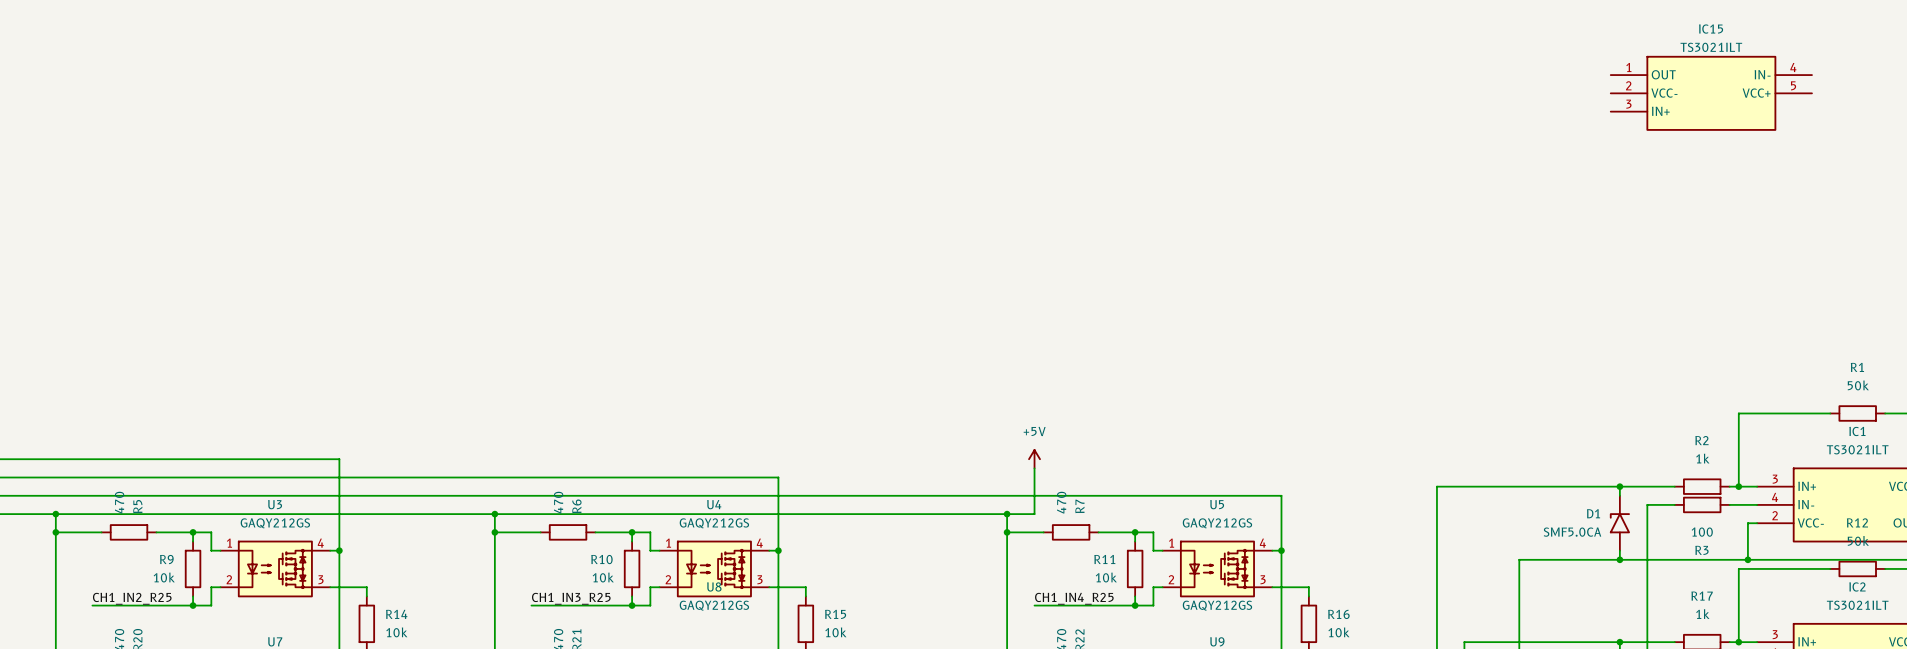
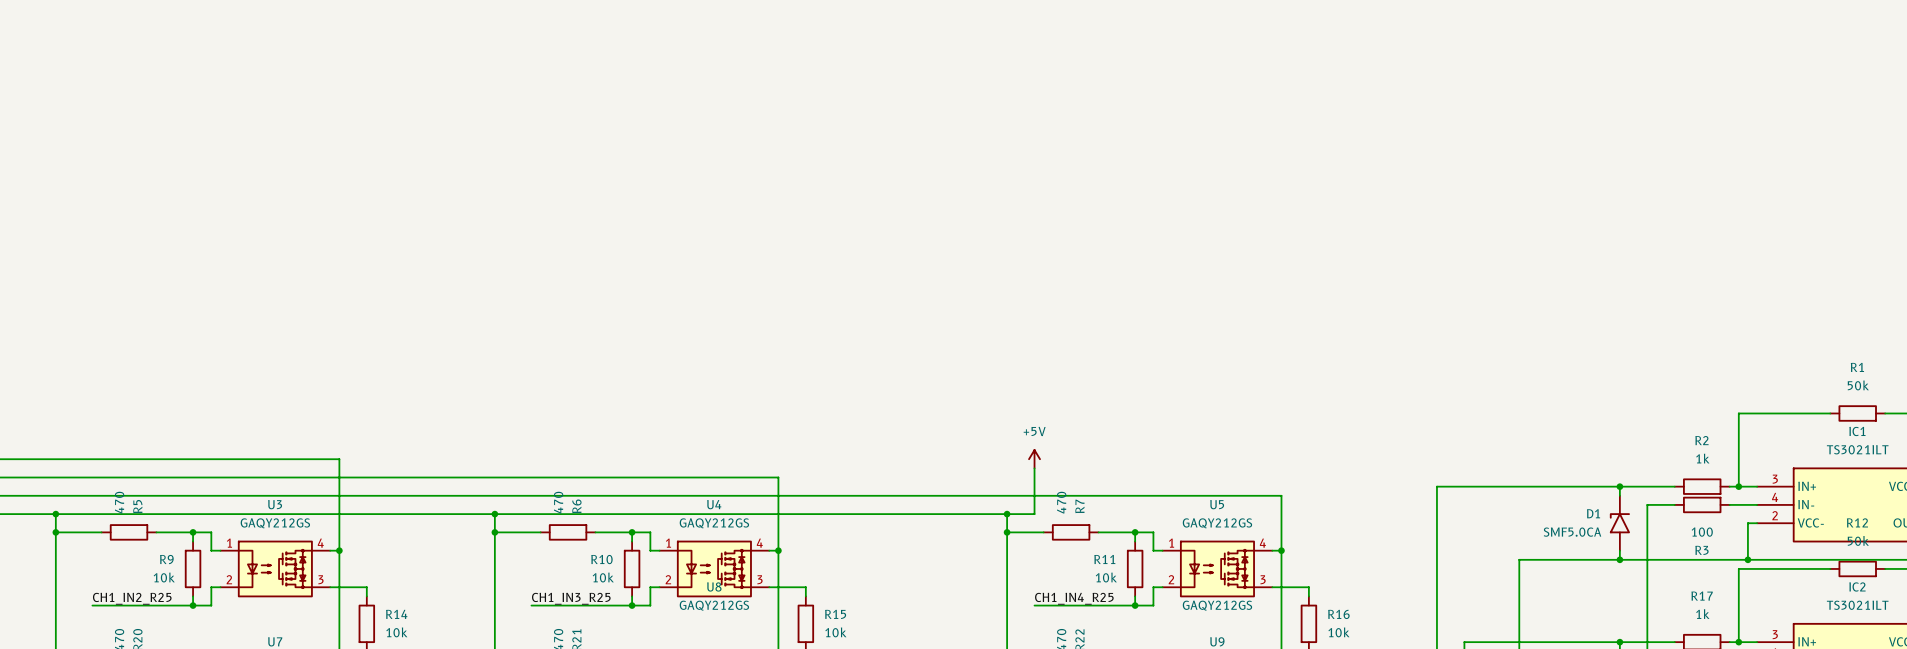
IC15: TS3021ILT (1711, 93) -> none

